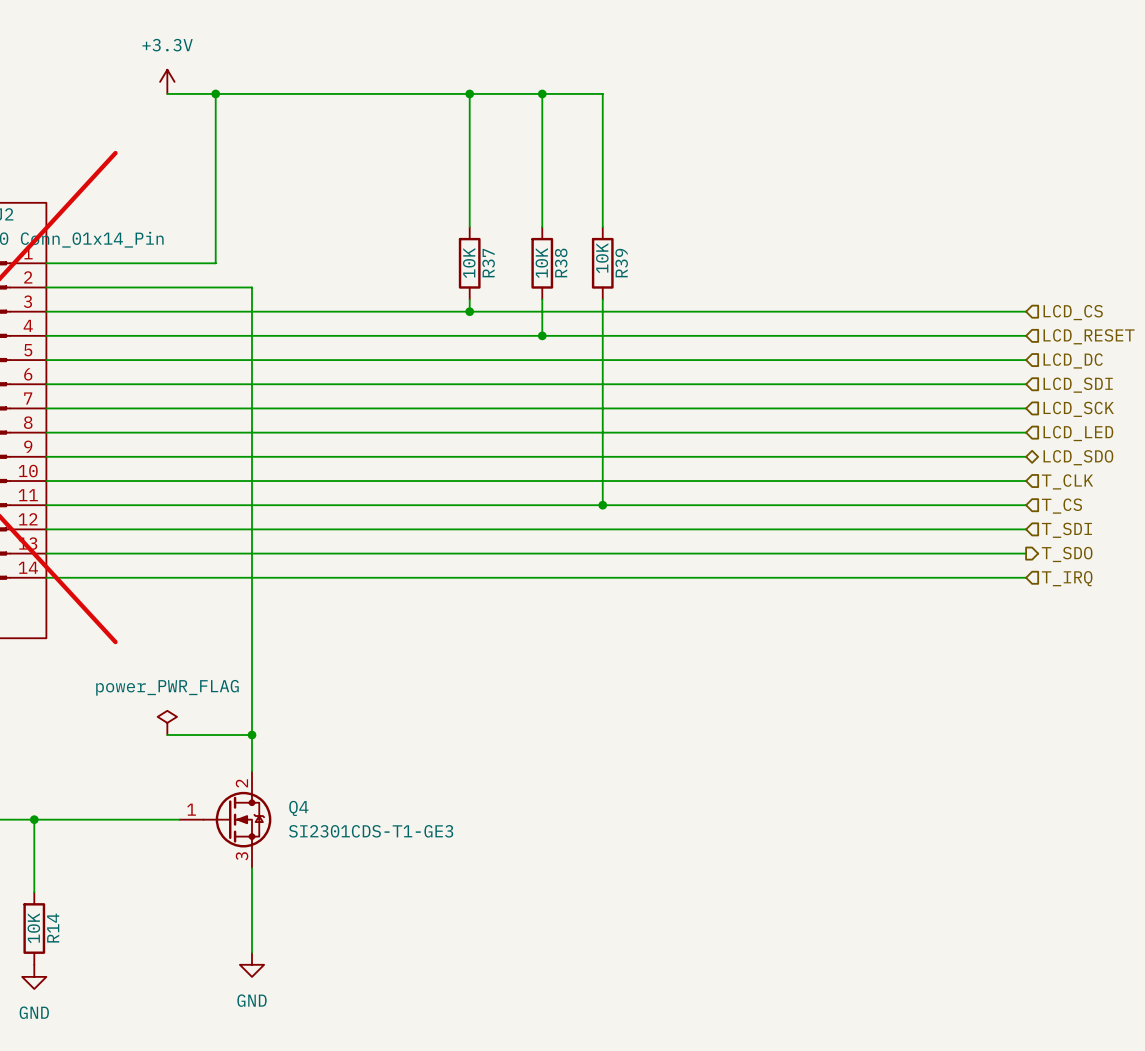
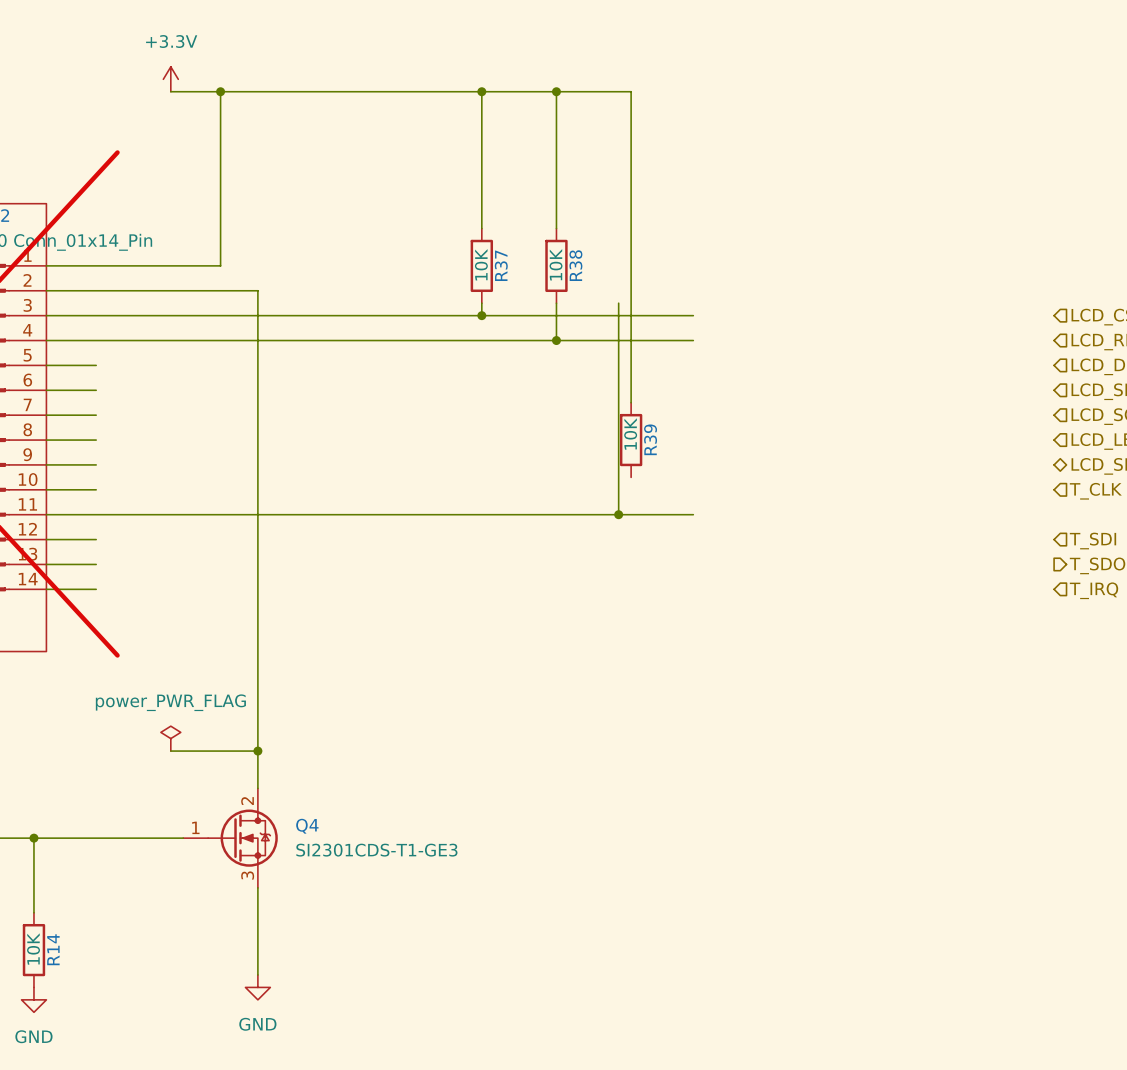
wire: (602, 93) (602, 227) -> (618, 91) (631, 91) (631, 402)
R39 position: (602, 263) -> (631, 440)
wire: (675, 311) (1026, 311) -> none
wire: (675, 335) (1026, 335) -> none
wire: (94, 360) (1026, 360) -> none
wire: (94, 384) (1026, 384) -> none
wire: (94, 408) (1026, 408) -> none
wire: (94, 432) (1026, 432) -> none
wire: (94, 456) (1026, 456) -> none
wire: (94, 481) (1026, 481) -> none
wire: (675, 505) (1026, 505) -> none
hierarchical label: T_CS (1061, 506) -> none
wire: (94, 529) (1026, 529) -> none
wire: (94, 553) (1026, 553) -> none
wire: (94, 577) (1026, 577) -> none

